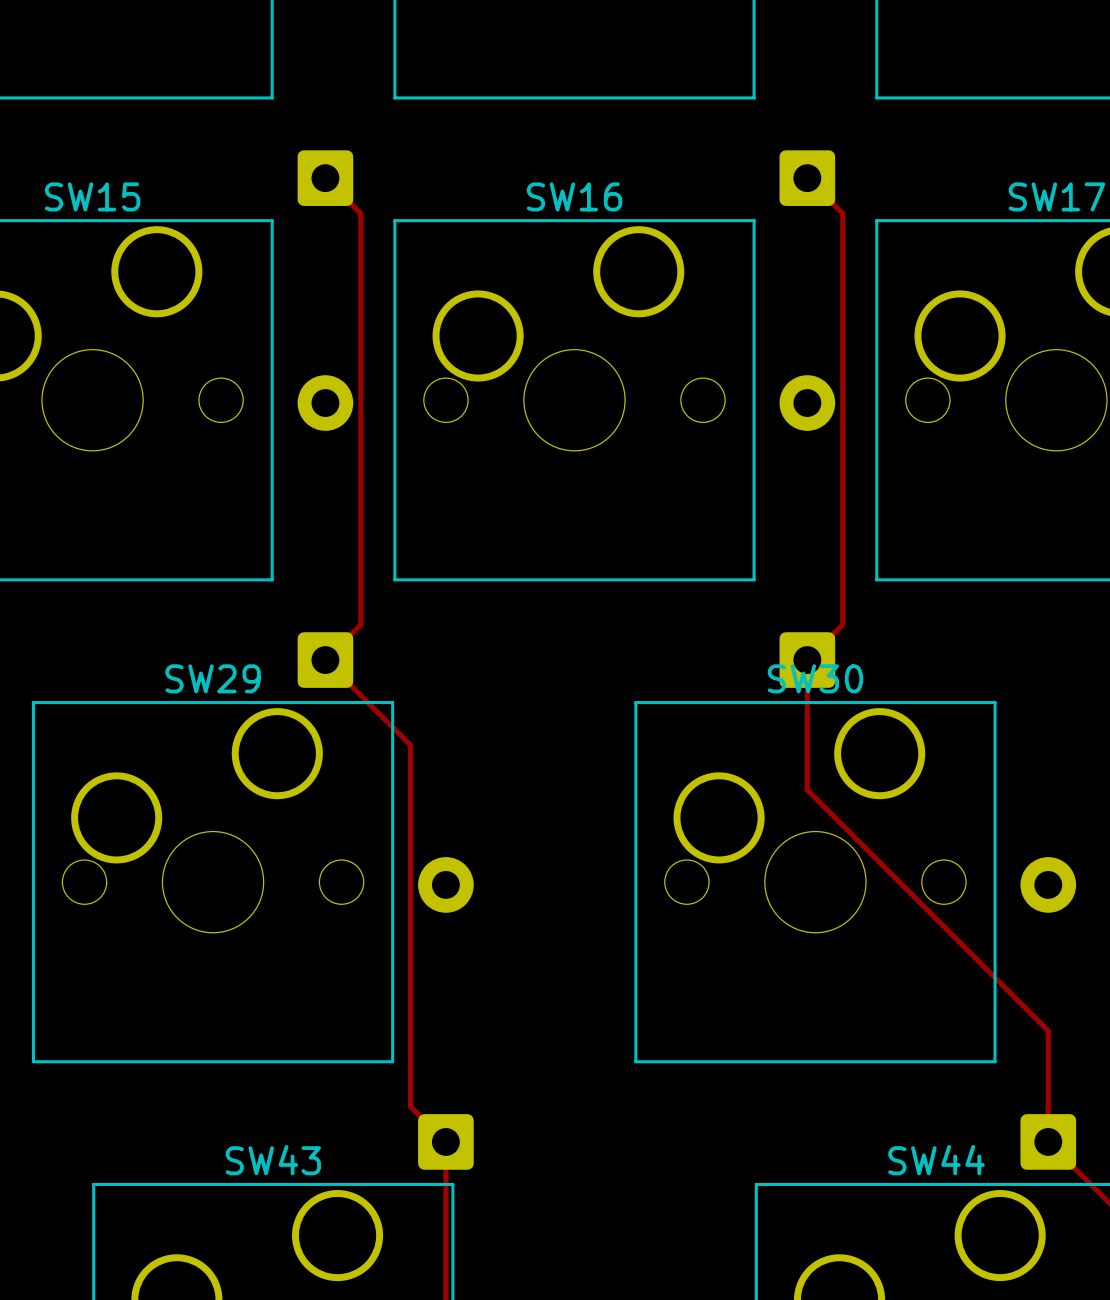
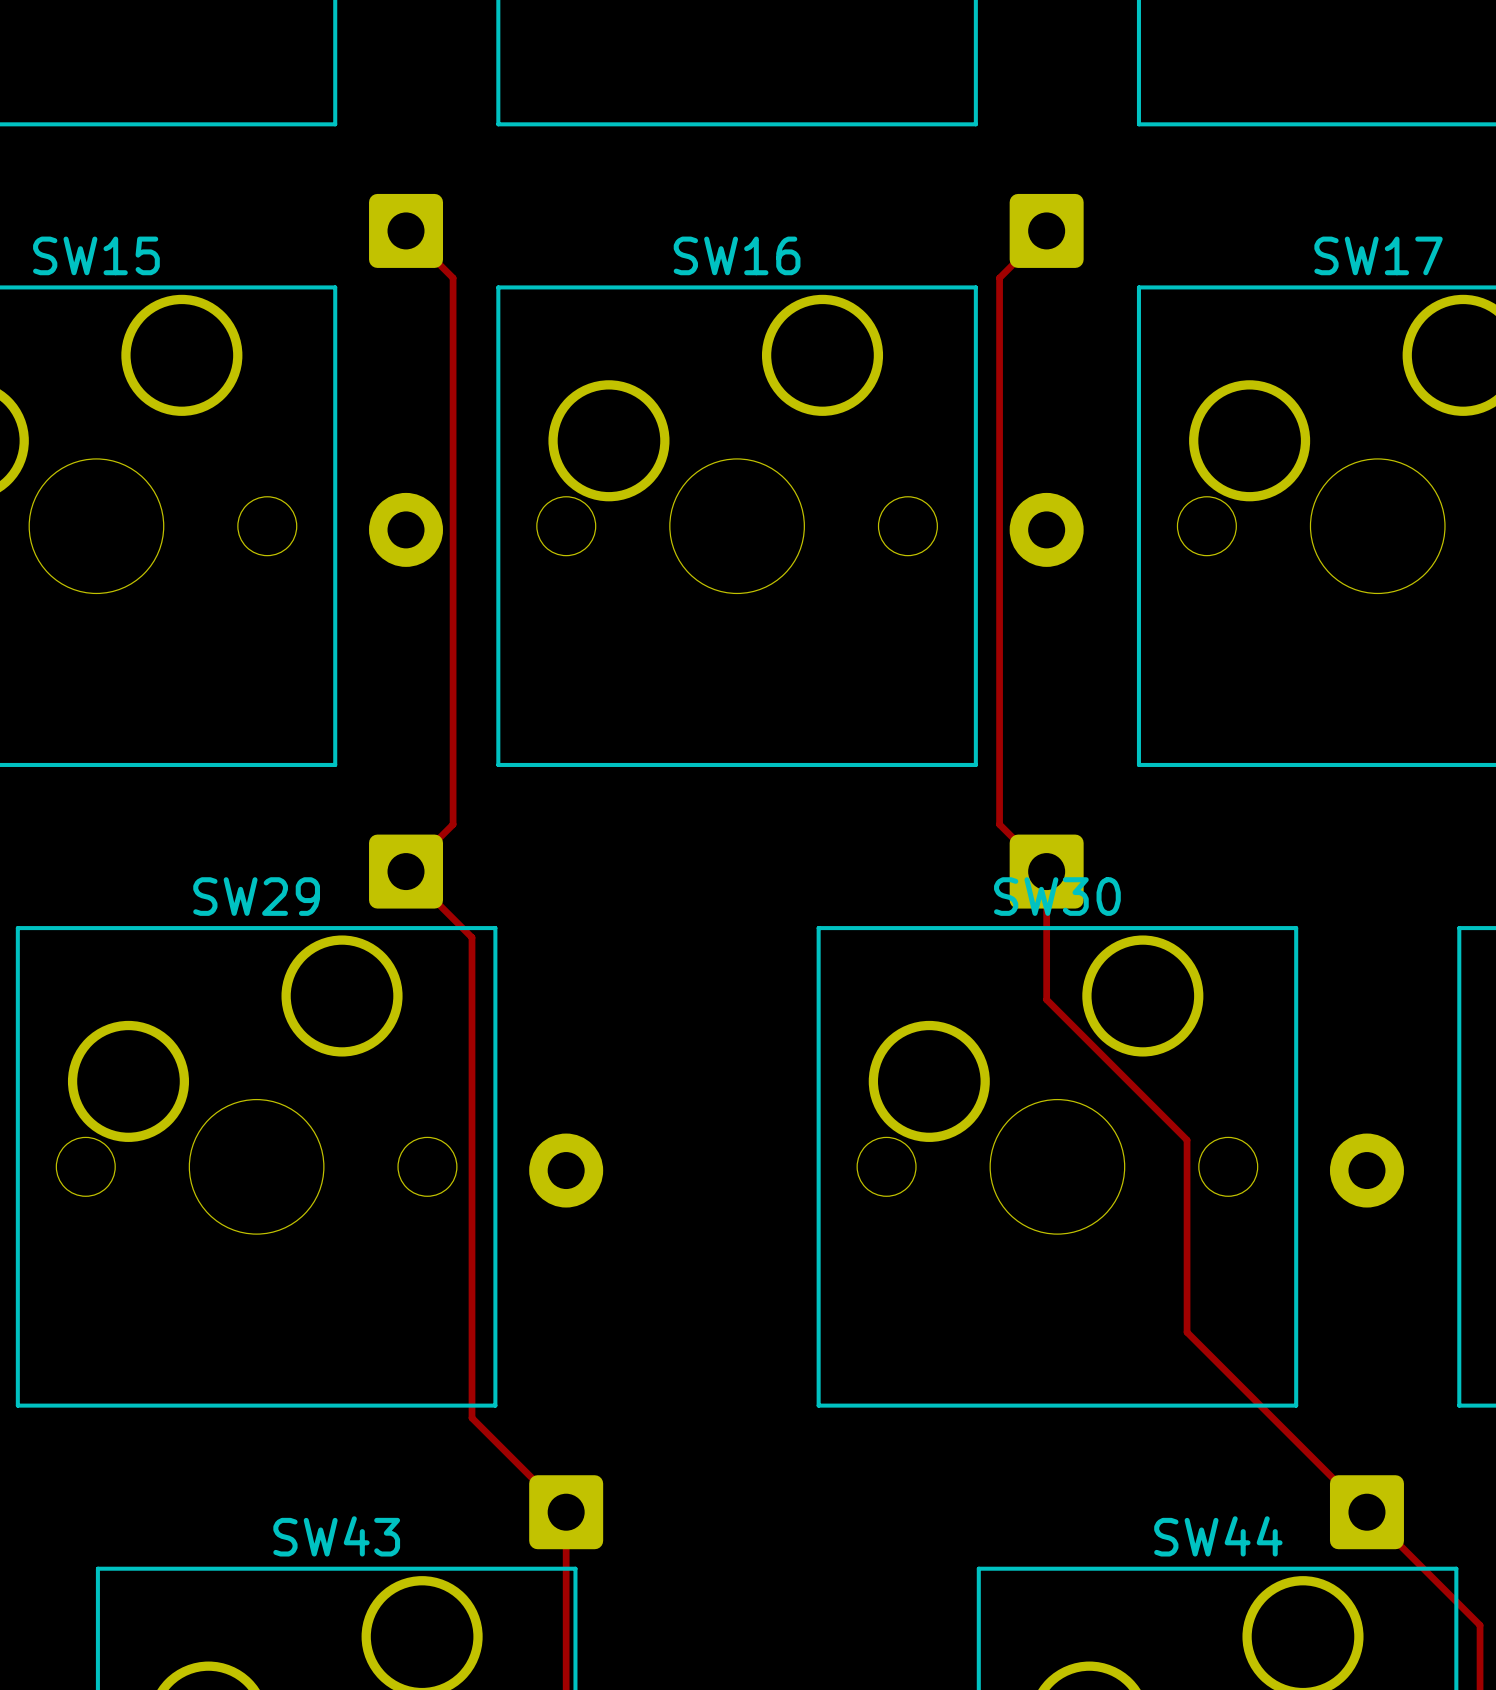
track: (807, 178) (842, 213) (842, 624) (807, 660) -> (1046, 230) (999, 278) (999, 824) (1046, 871)
track: (375, 709) (410, 745) (410, 1106) -> (472, 937) (472, 1418) (519, 1465)
track: (807, 756) (807, 789) (1048, 1030) (1048, 1141) -> (1046, 999) (1187, 1140) (1187, 1332) (1366, 1512)

